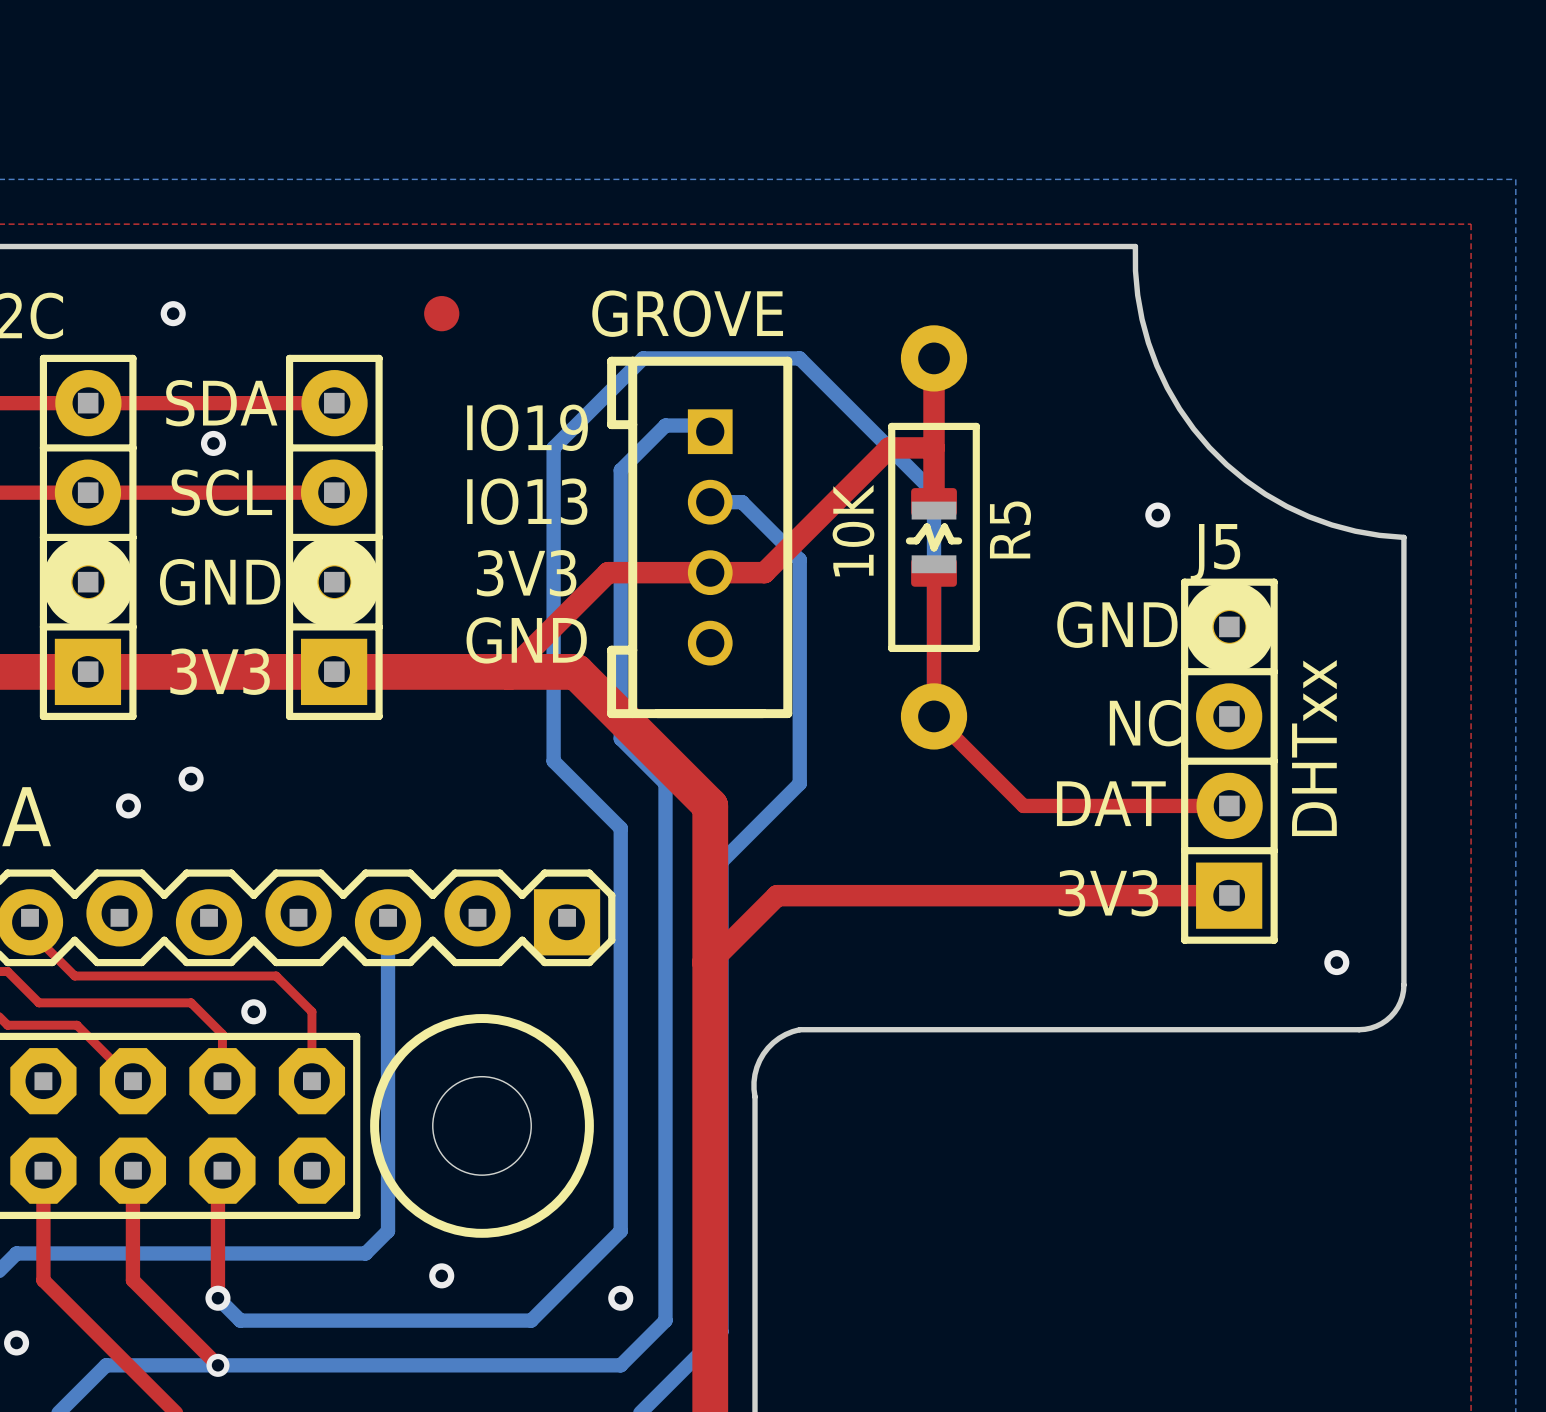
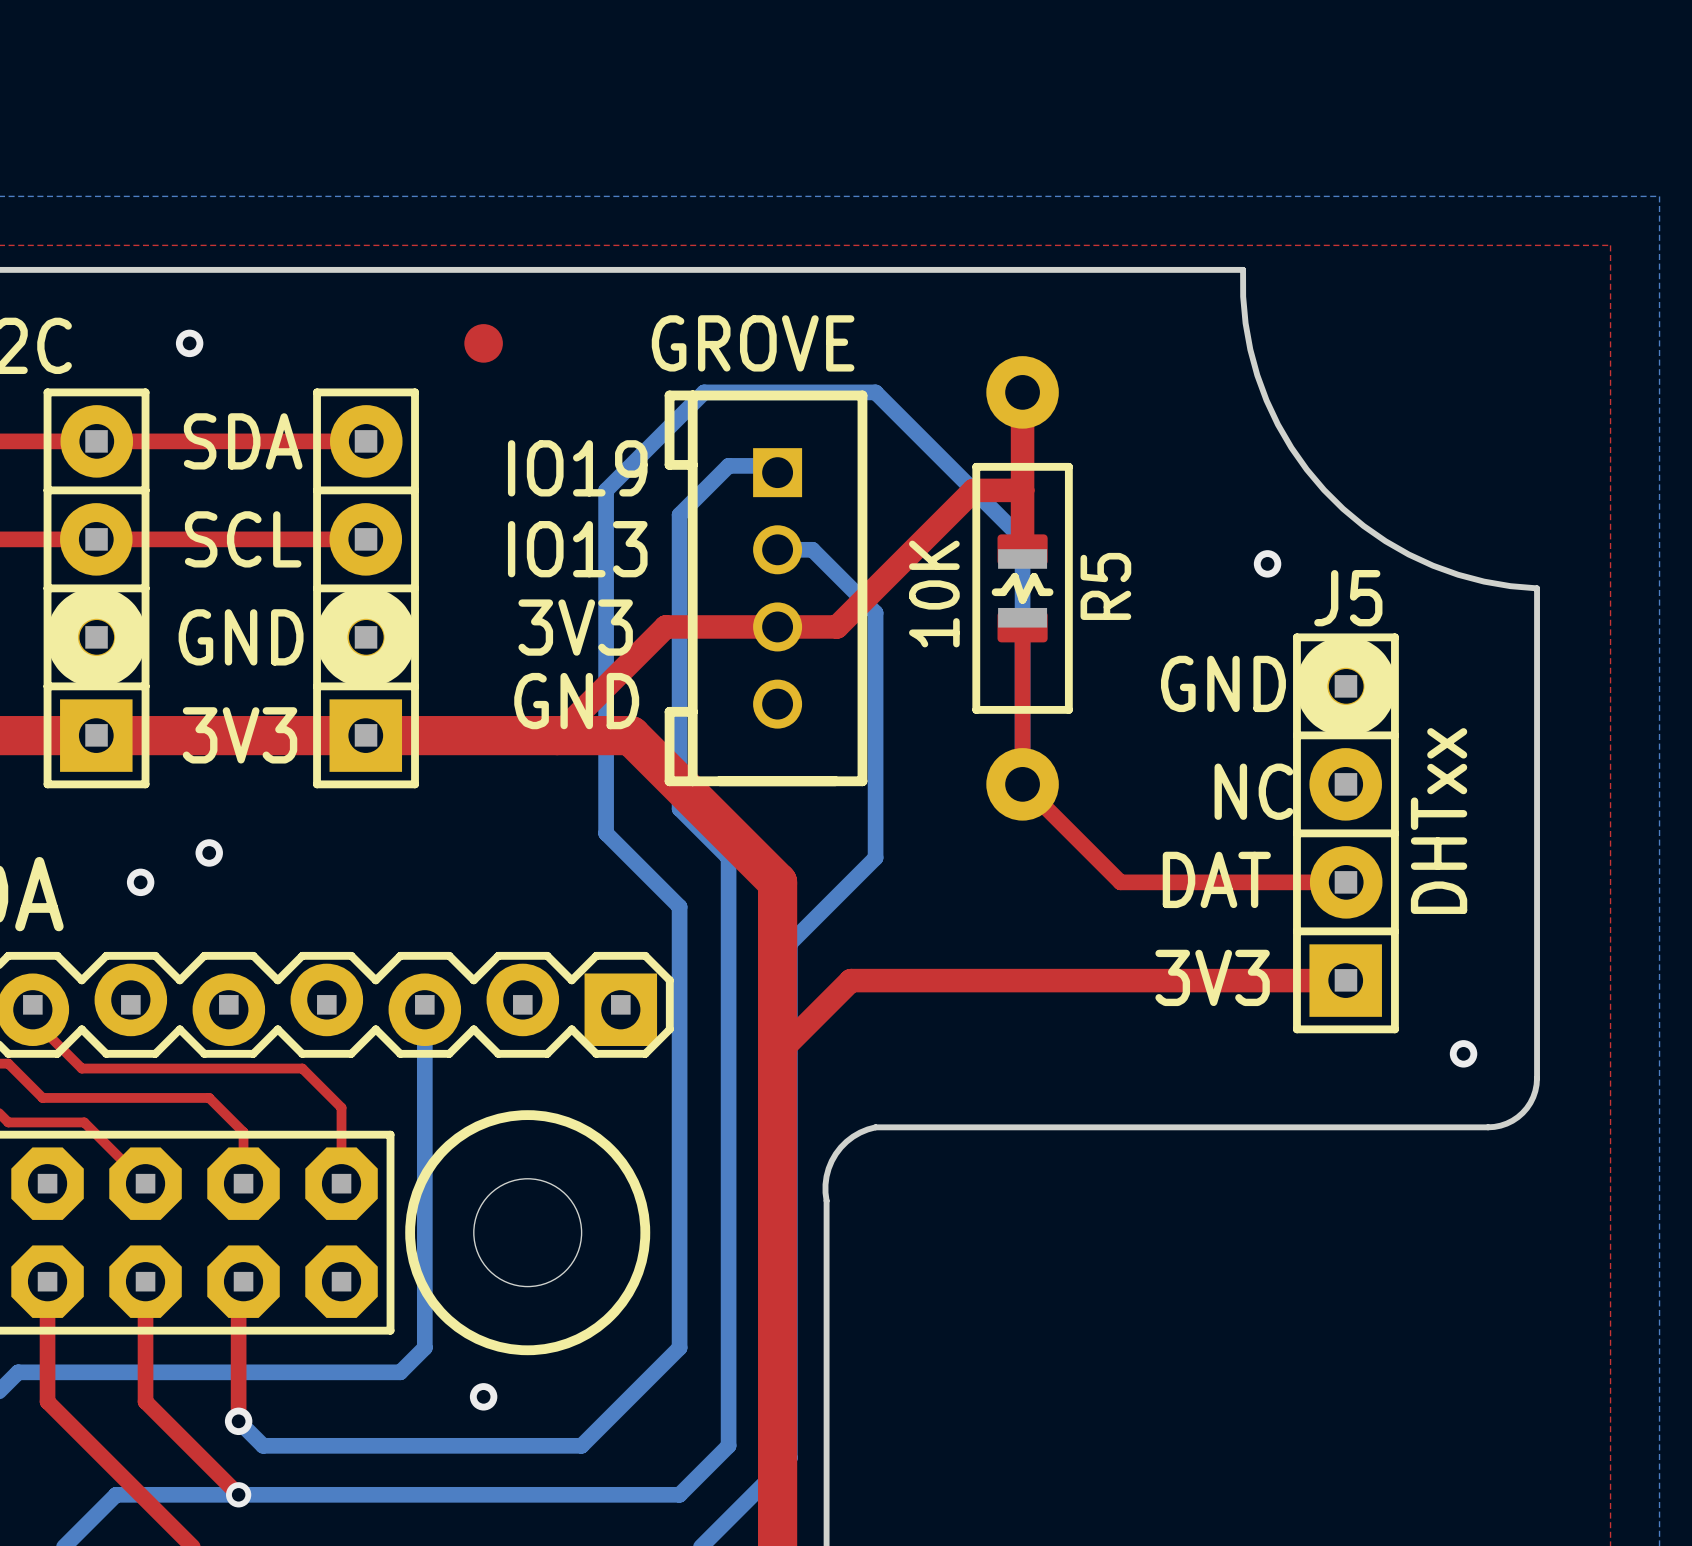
via: (213, 443) -> none
via: (253, 1011) -> none
via: (620, 1298) -> none
via: (16, 1342) -> none

